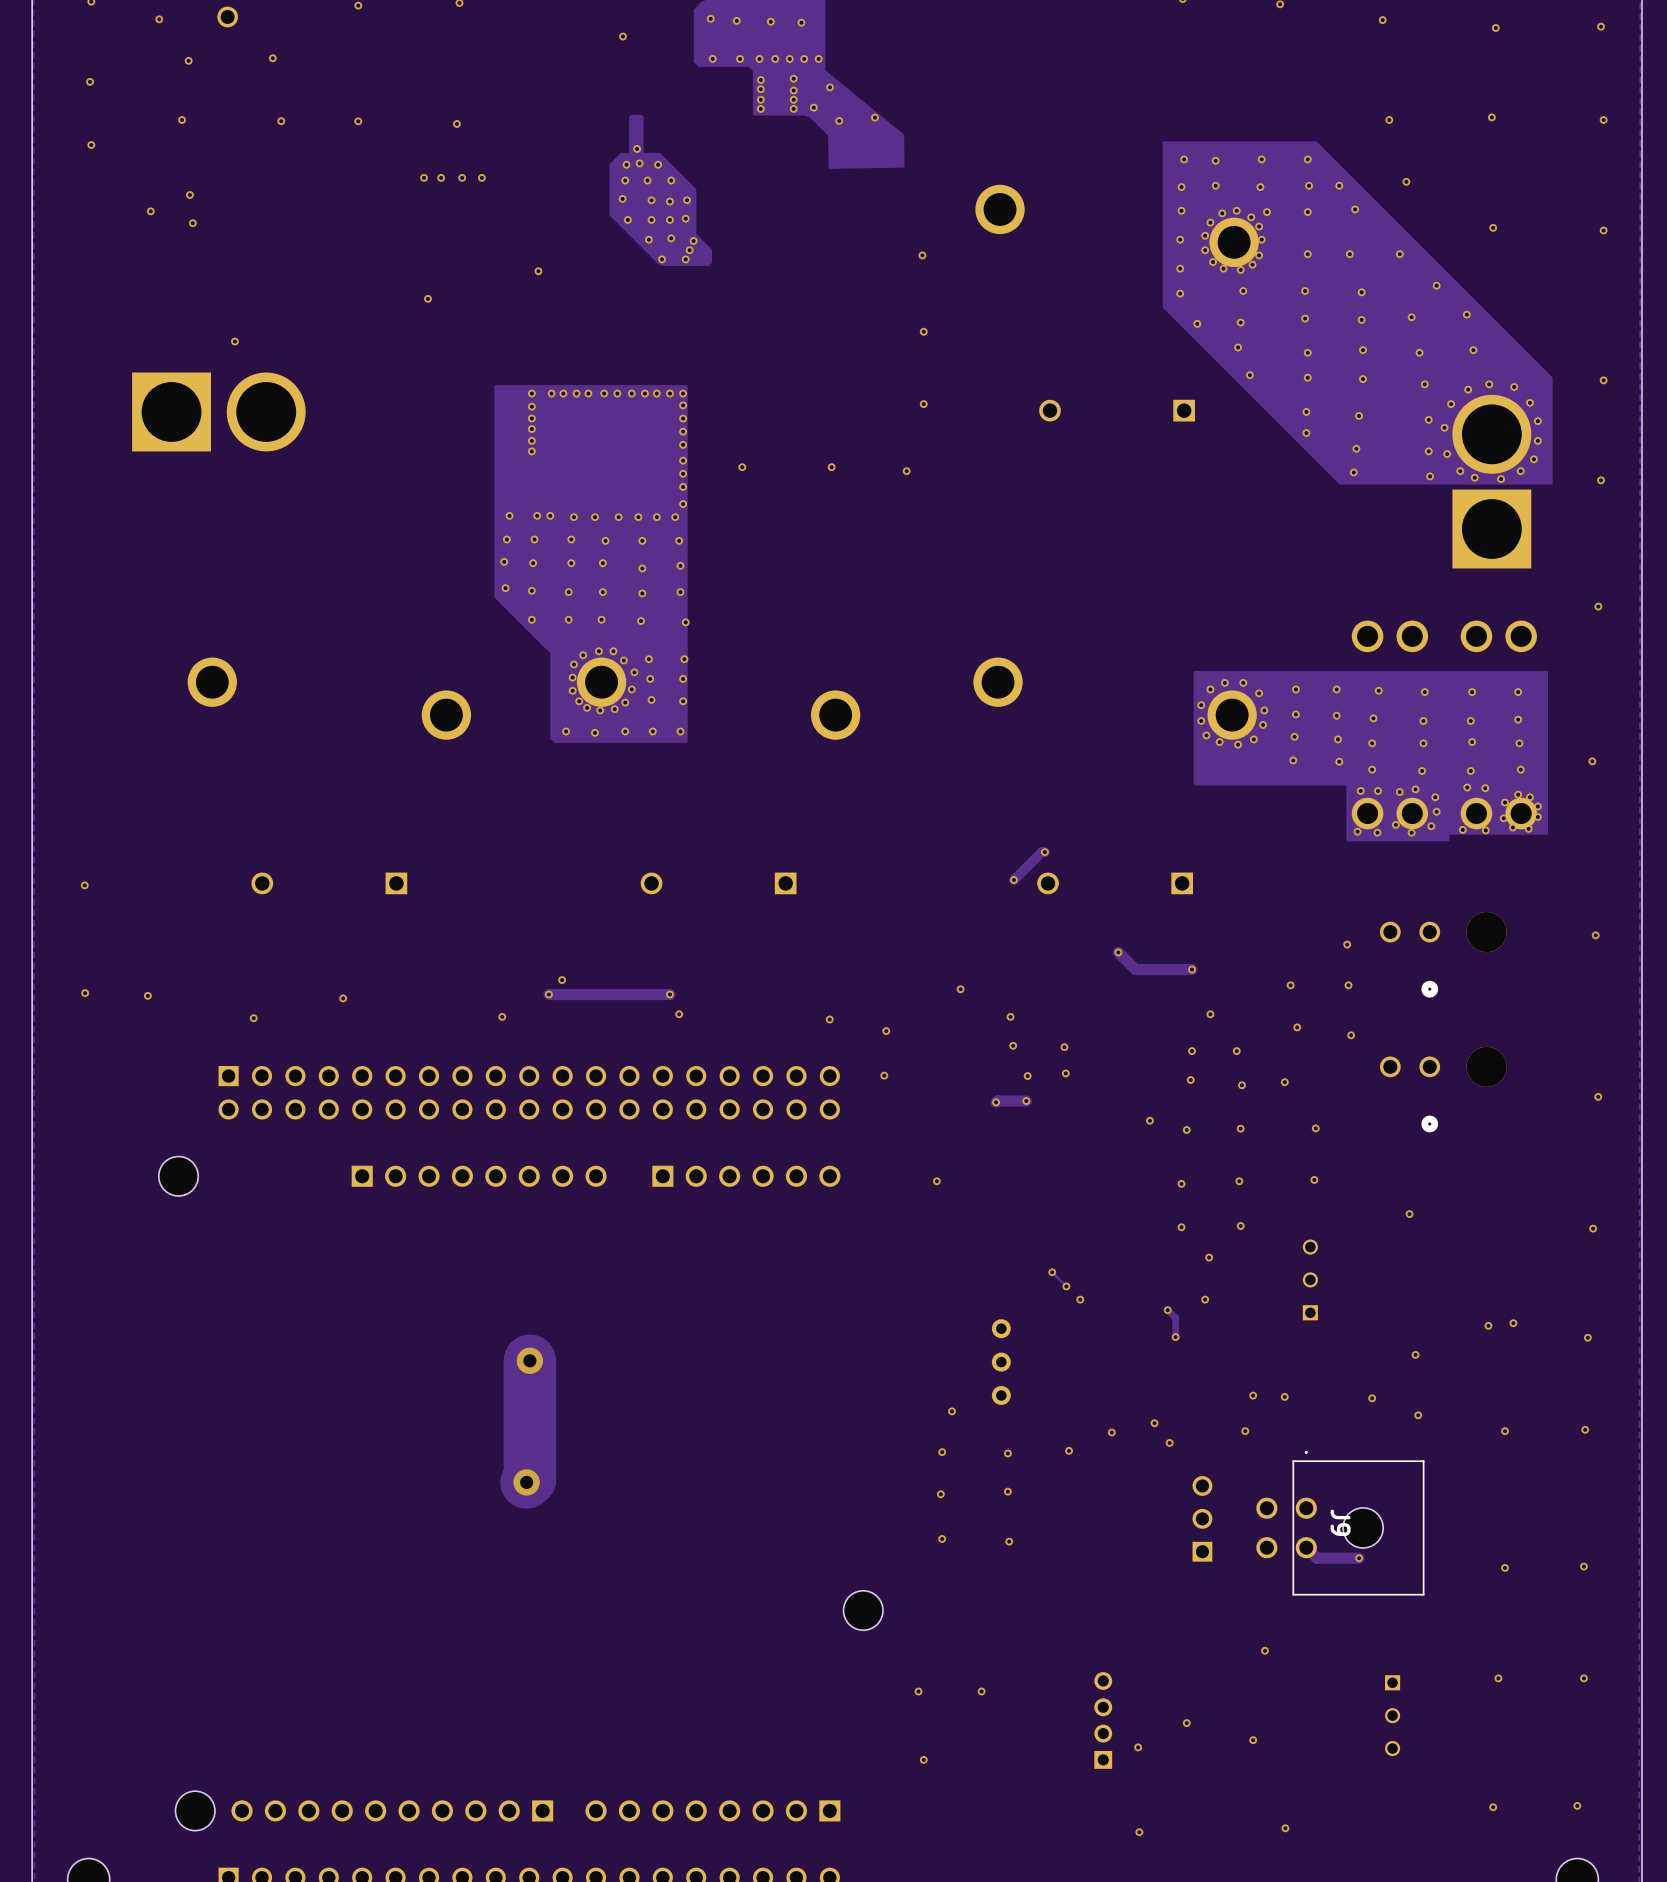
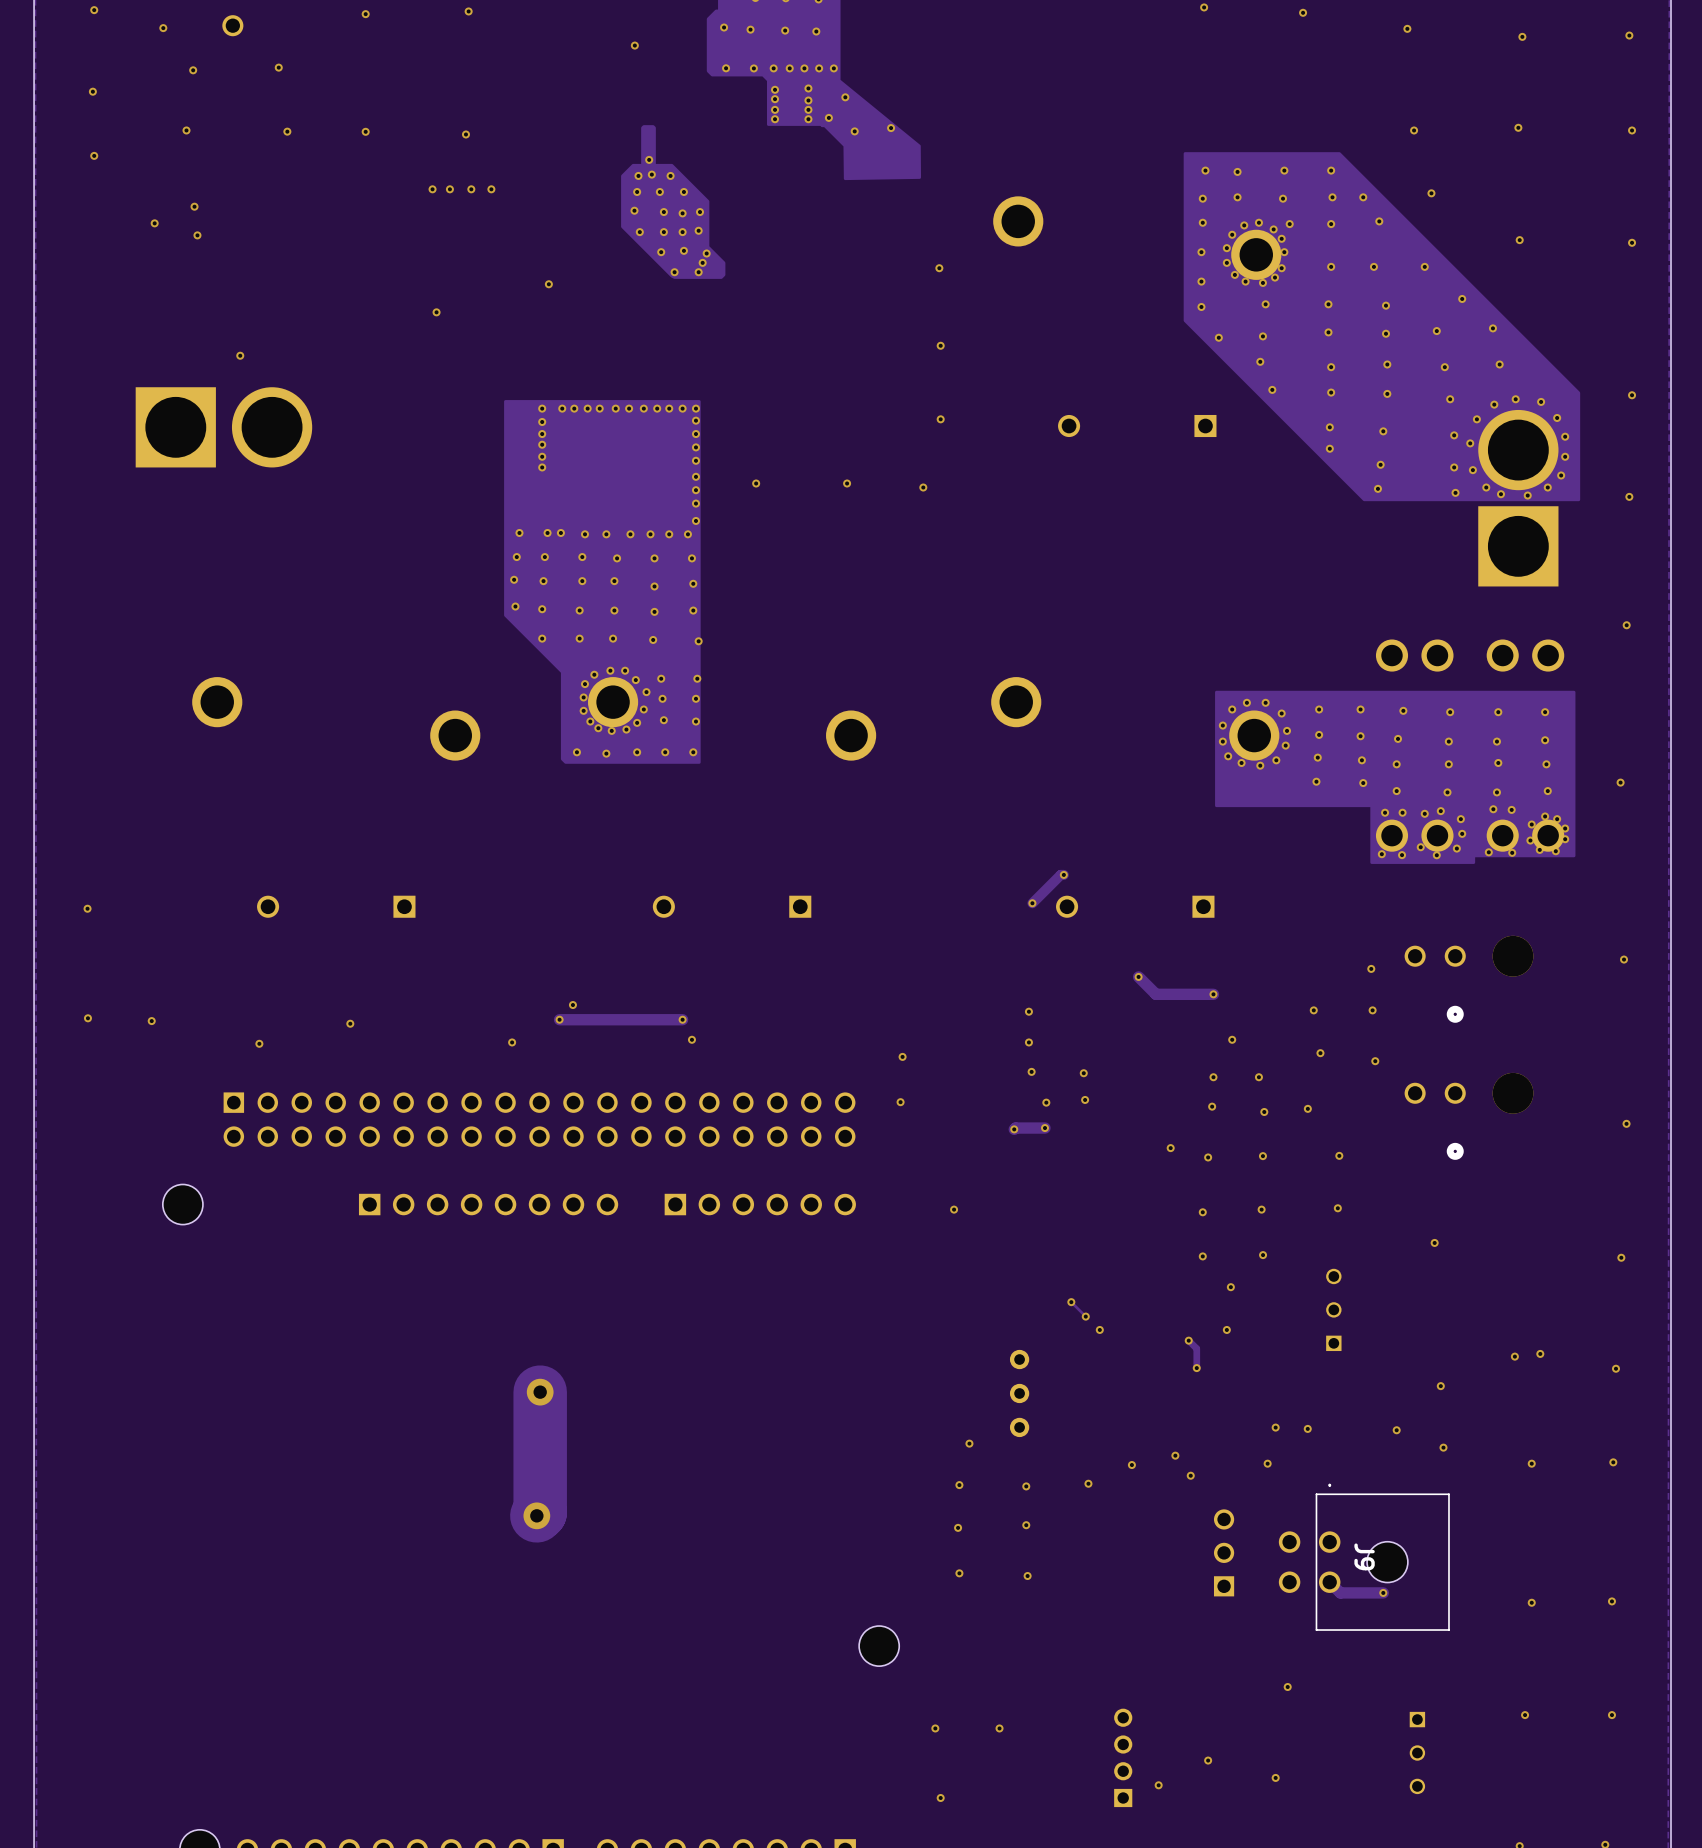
via position: (960, 989) -> (1028, 1011)
via: (829, 1019) -> none

